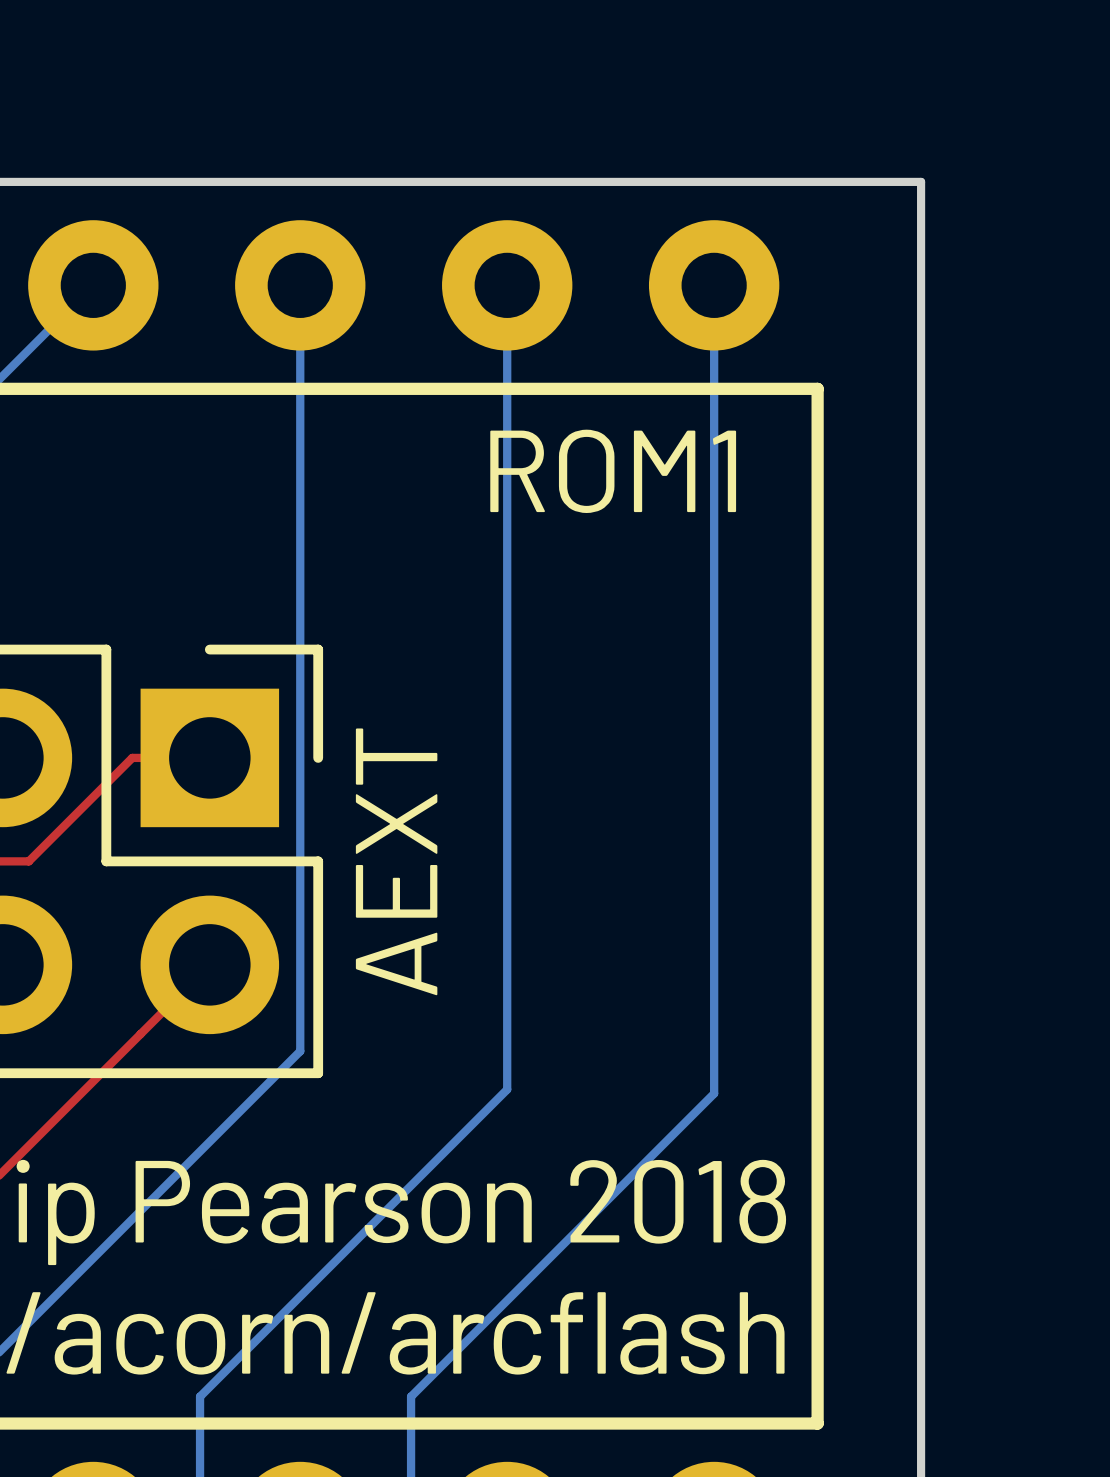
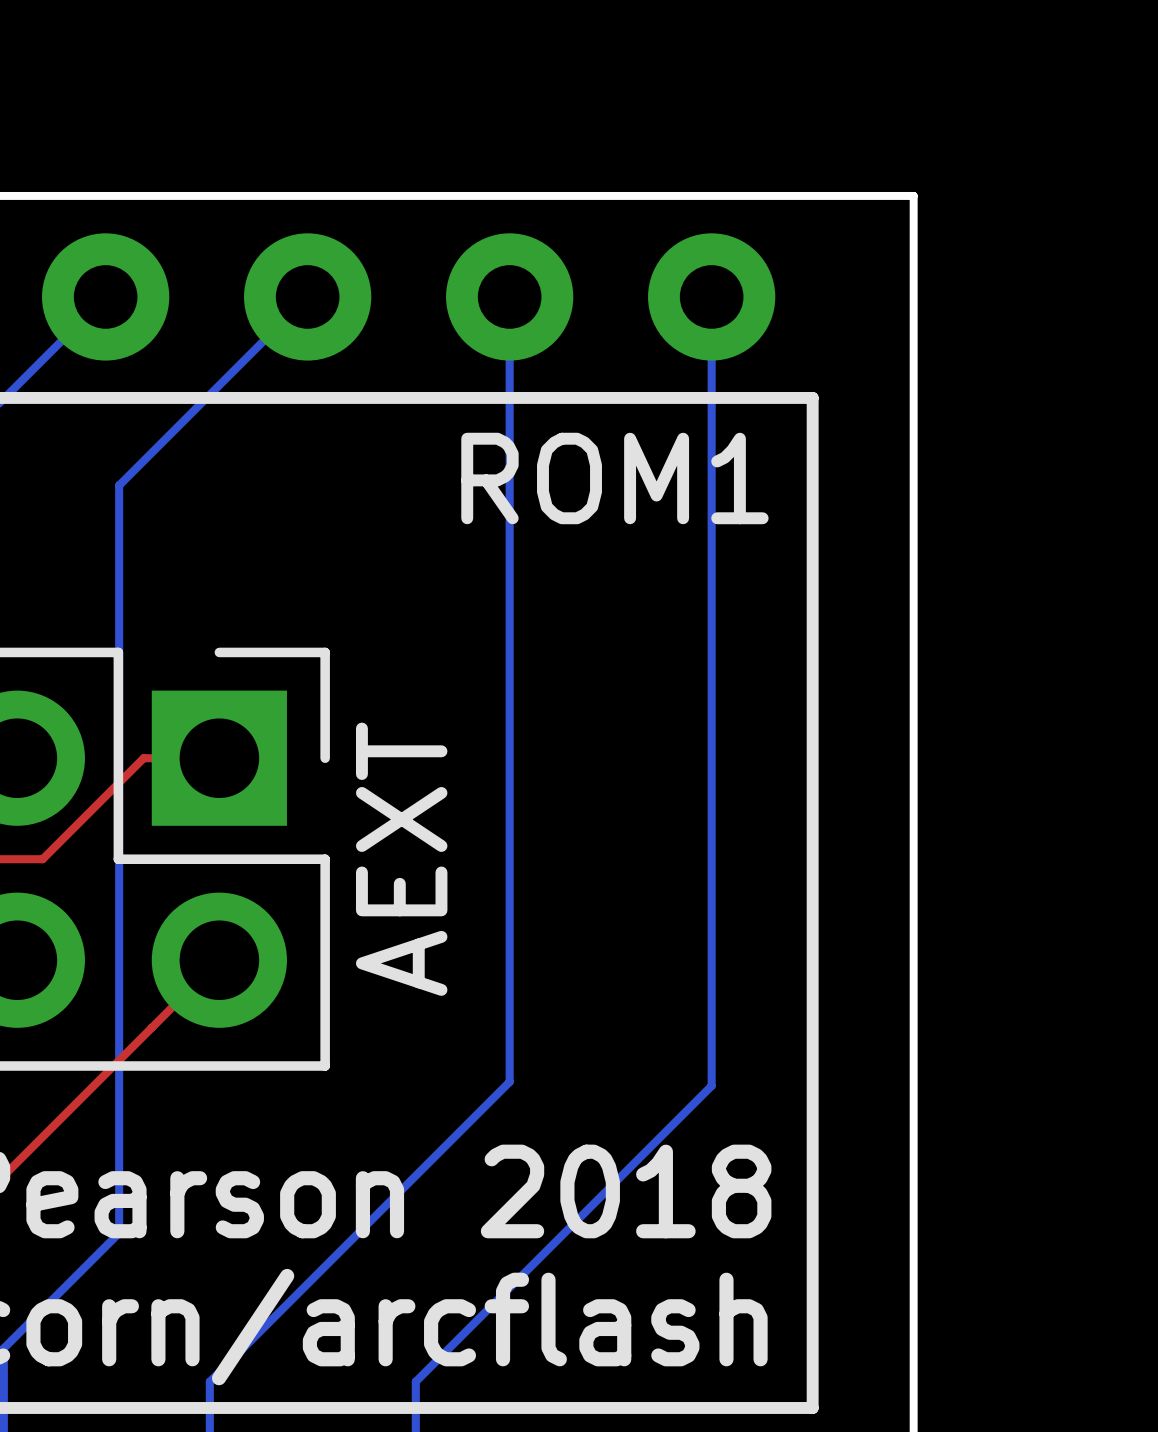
bottom track: (300, 285) (300, 1051) (107, 1244) -> (307, 296) (119, 485) (119, 1233)

